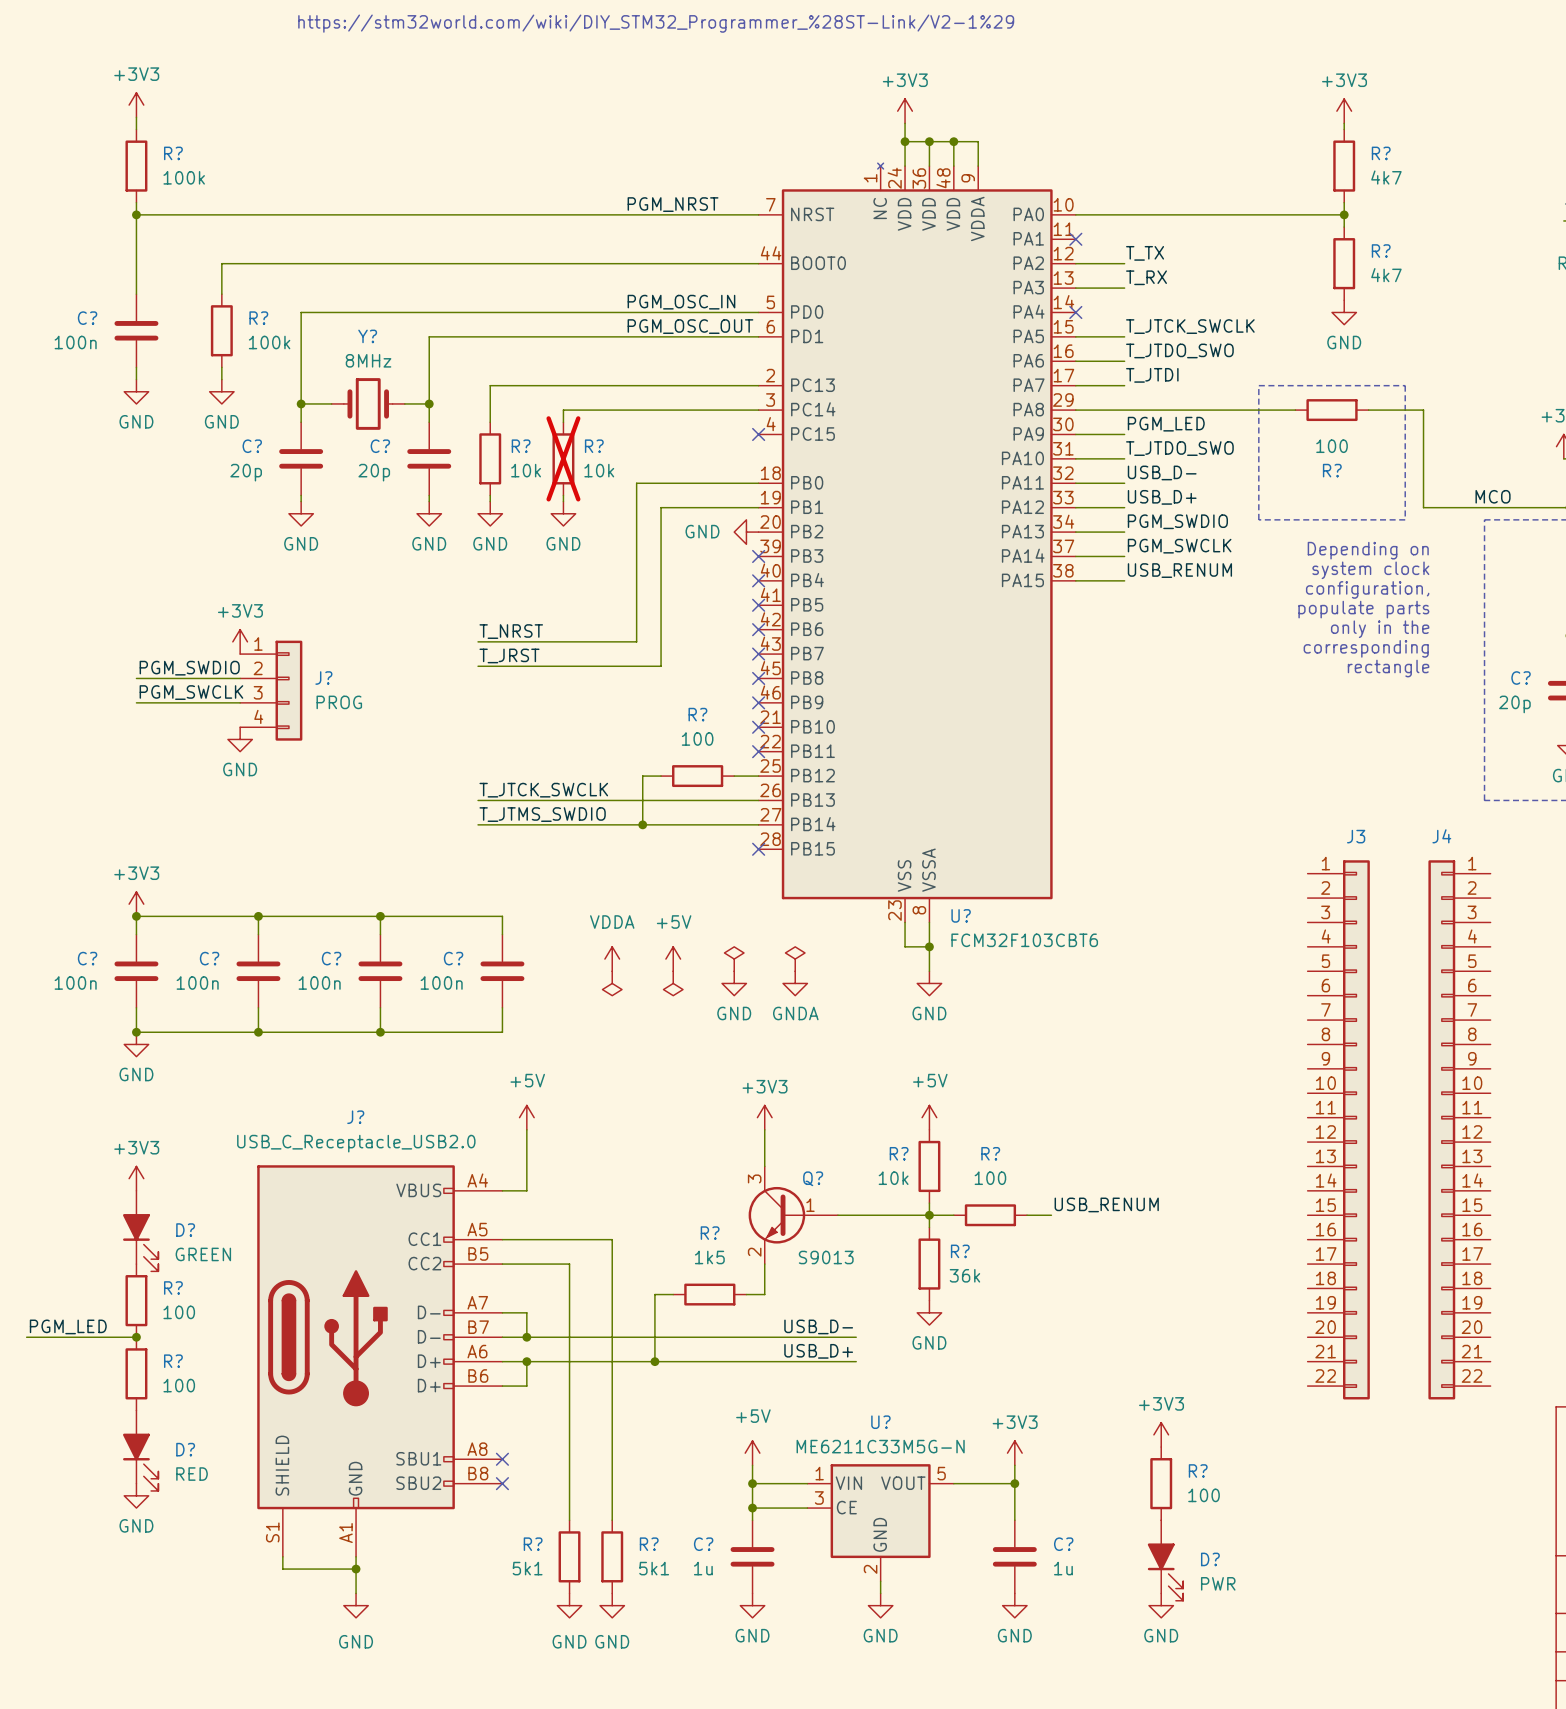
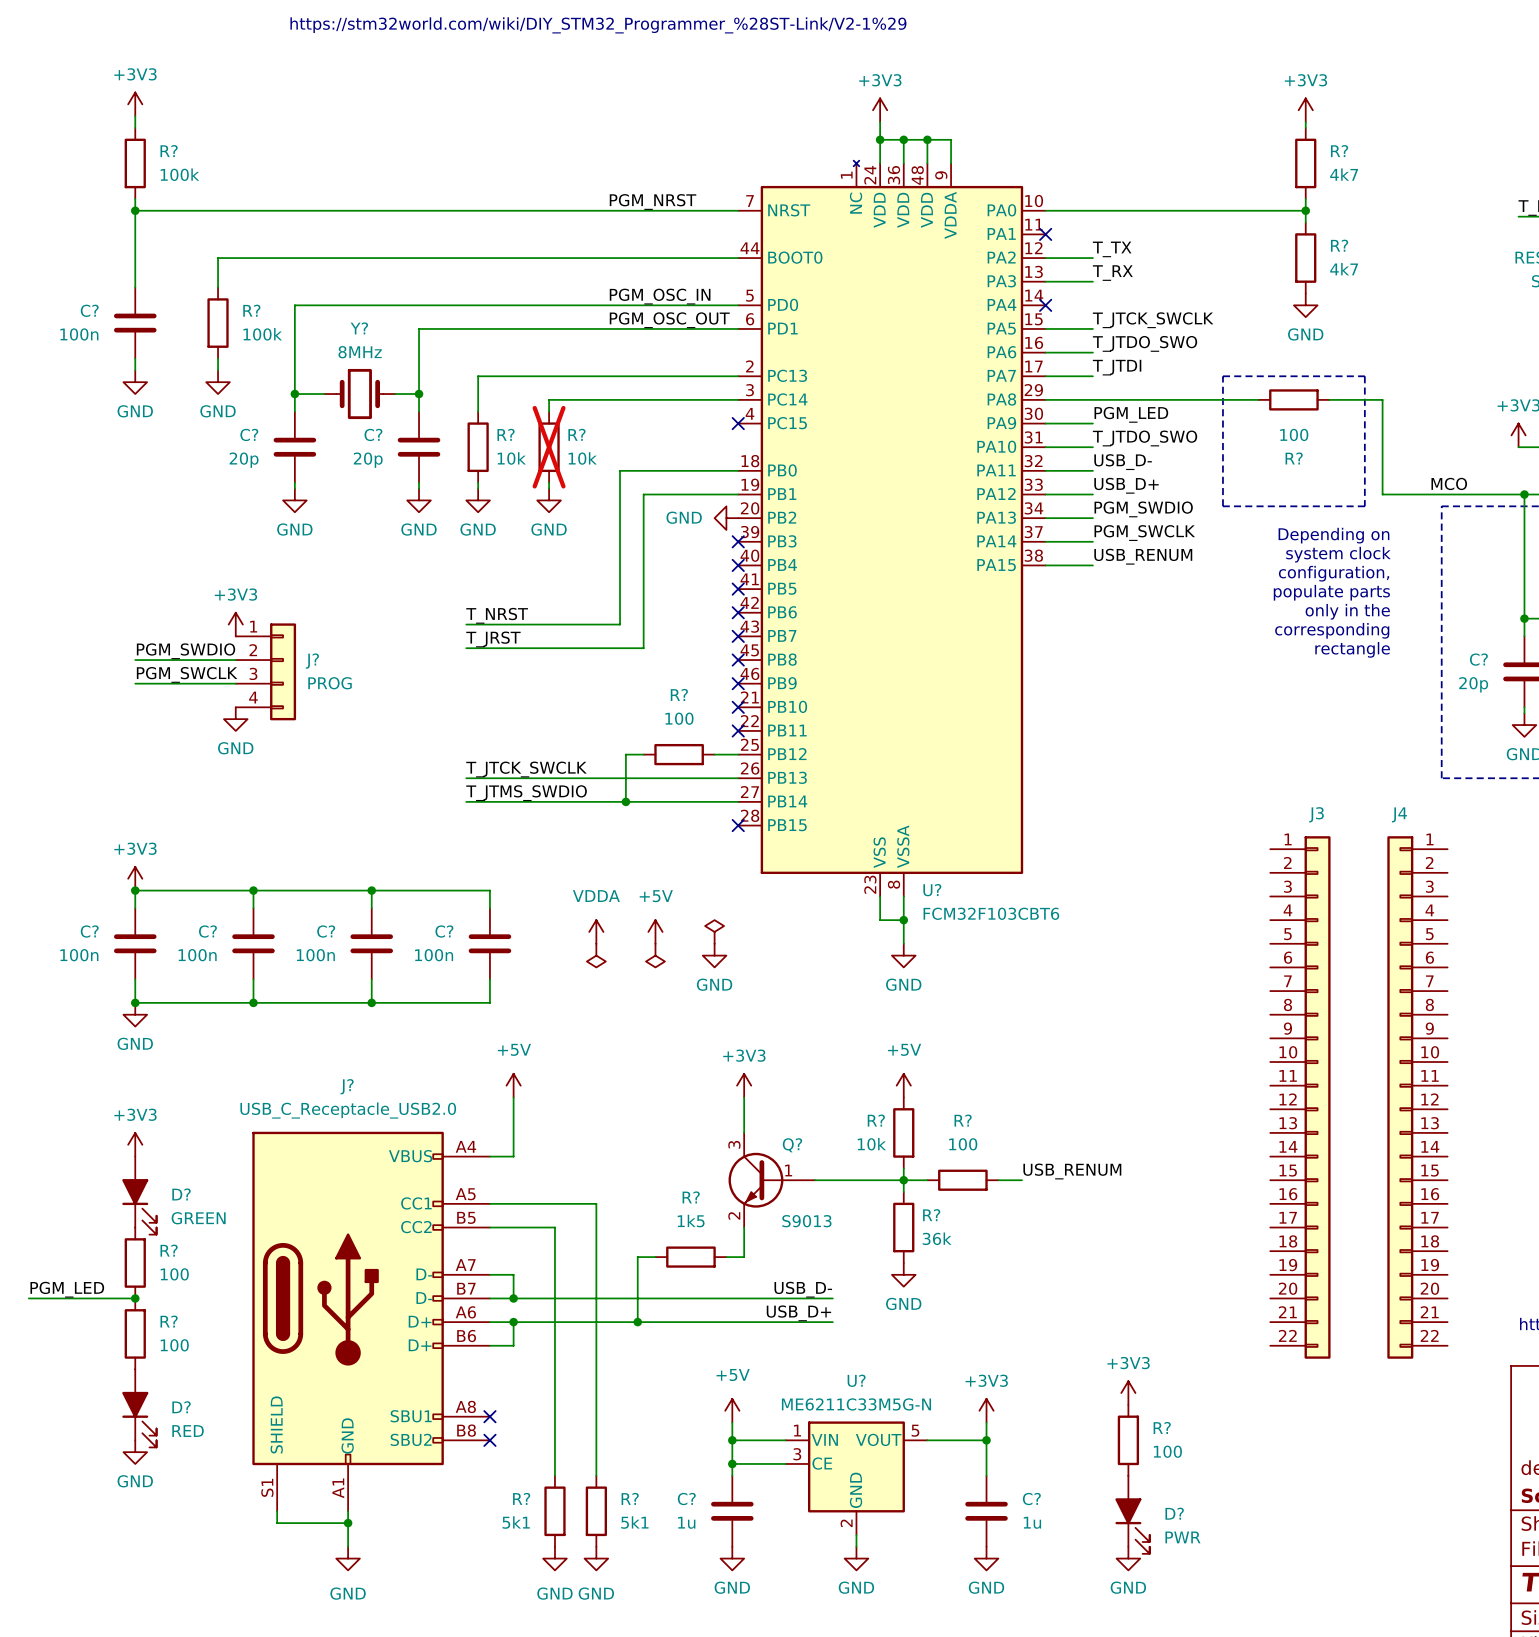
power symbol: (795, 959) -> none
power symbol: GNDA (795, 983) -> none

